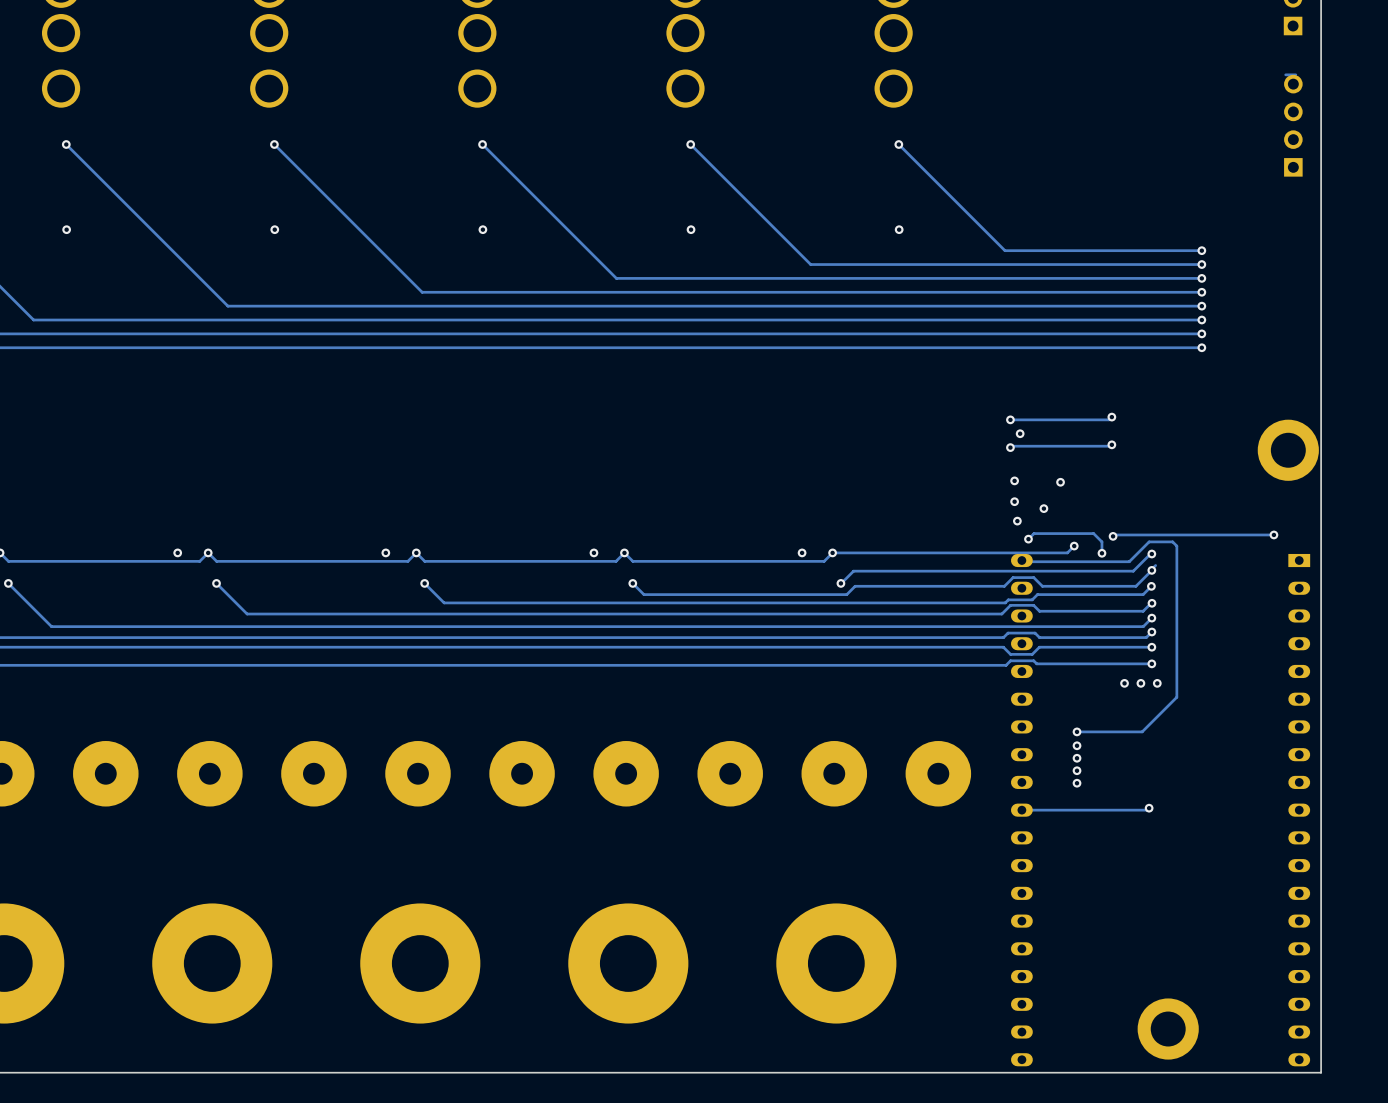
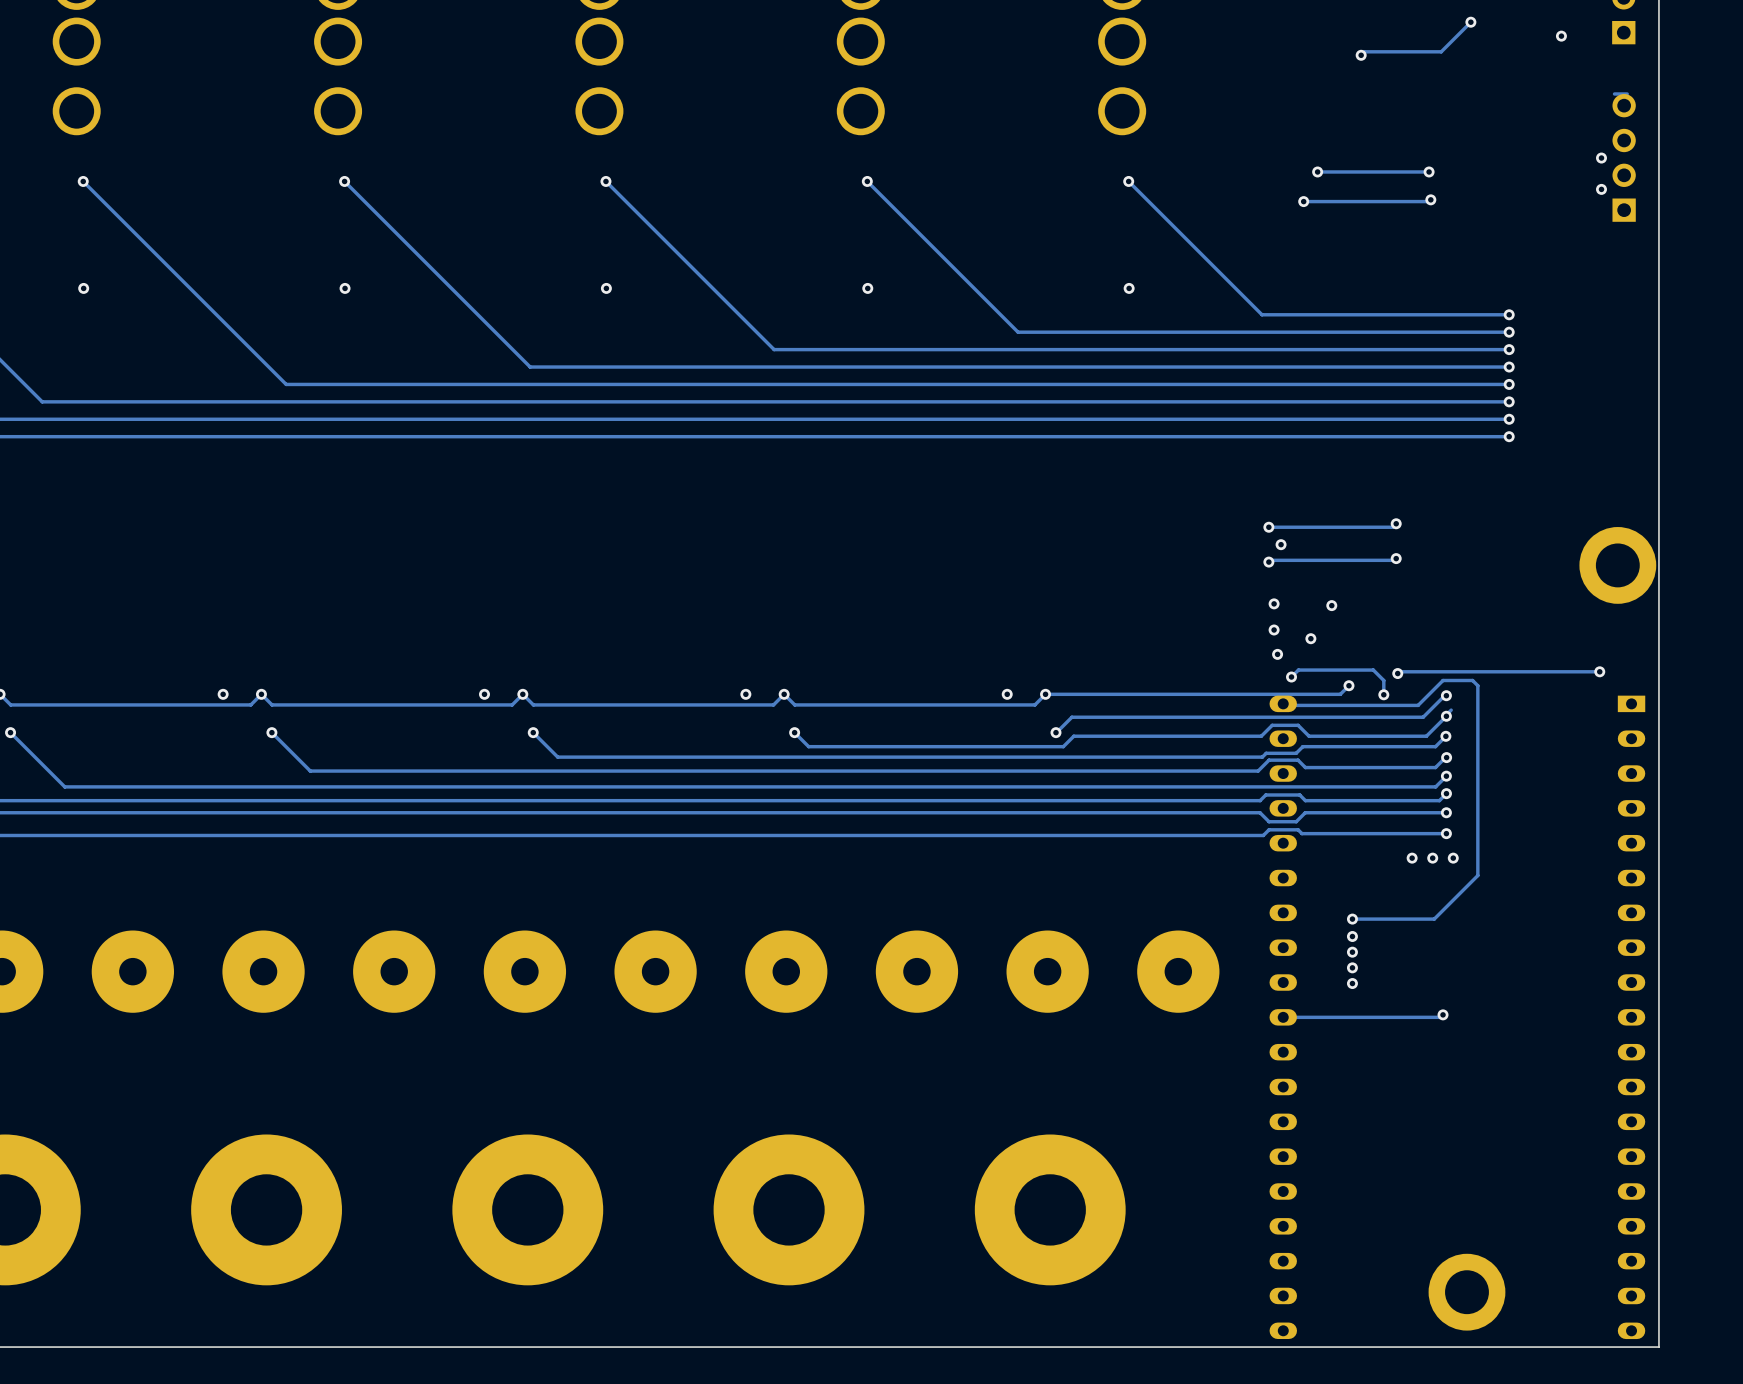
track: none -> (1470, 22) (1441, 51) (1364, 51) (1361, 55)
via: none -> (1470, 22)
via: none -> (1561, 36)
via: none -> (1361, 55)
via: none -> (1601, 158)
via: none -> (1317, 171)
track: none -> (1429, 171) (1317, 171)
via: none -> (1429, 171)
via: none -> (1601, 189)
track: none -> (1430, 199) (1429, 201) (1303, 201)
via: none -> (1430, 199)
via: none -> (1303, 201)

